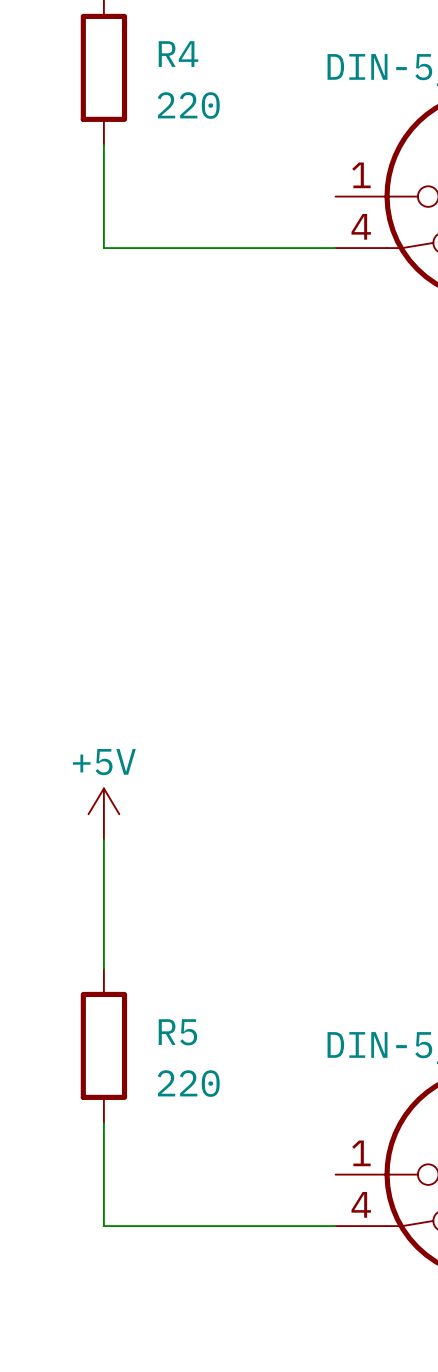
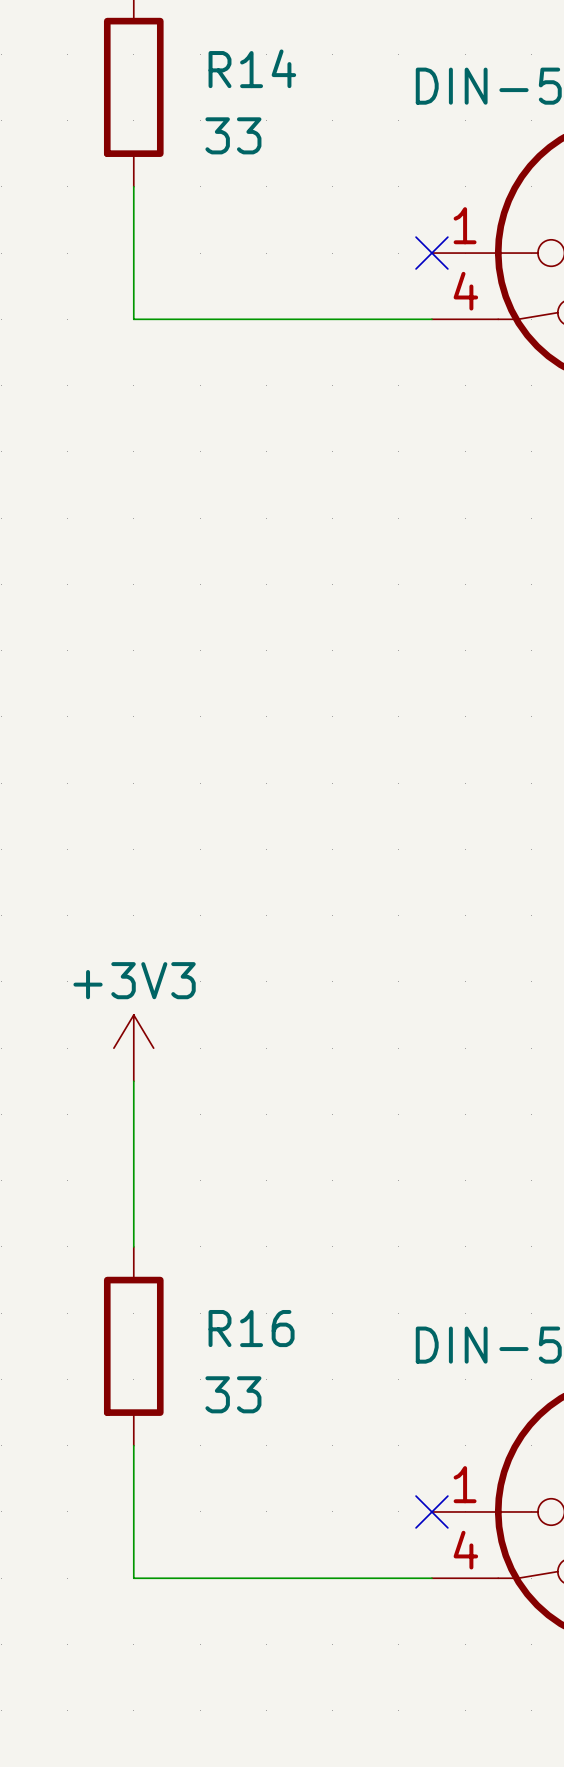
R4 name: R4 (178, 54) -> R14 (252, 68)
R4 value: 220 (188, 105) -> 33 (233, 135)
no-connect mark: none -> (431, 253)
power symbol: +5V (103, 814) -> +3V3 (133, 1048)
R5 name: R5 (177, 1032) -> R16 (251, 1328)
R5 value: 220 (188, 1083) -> 33 (233, 1394)
no-connect mark: none -> (431, 1511)

